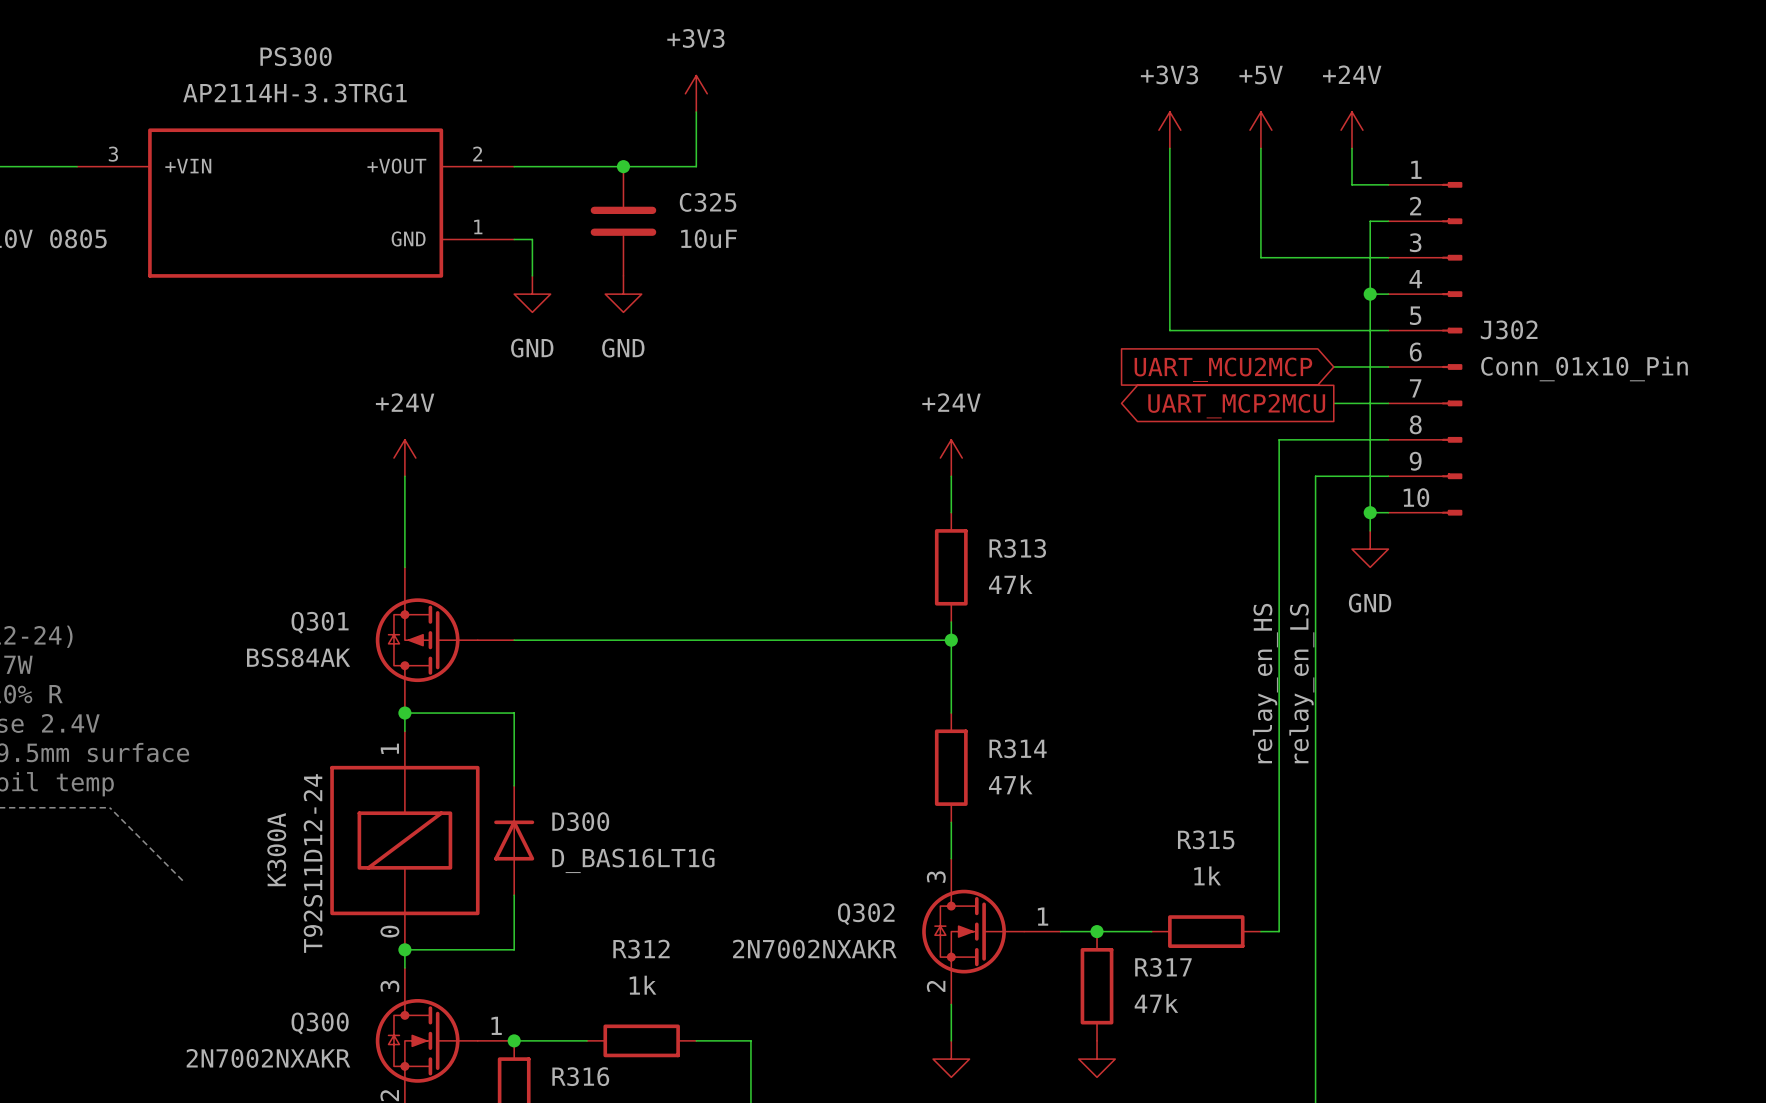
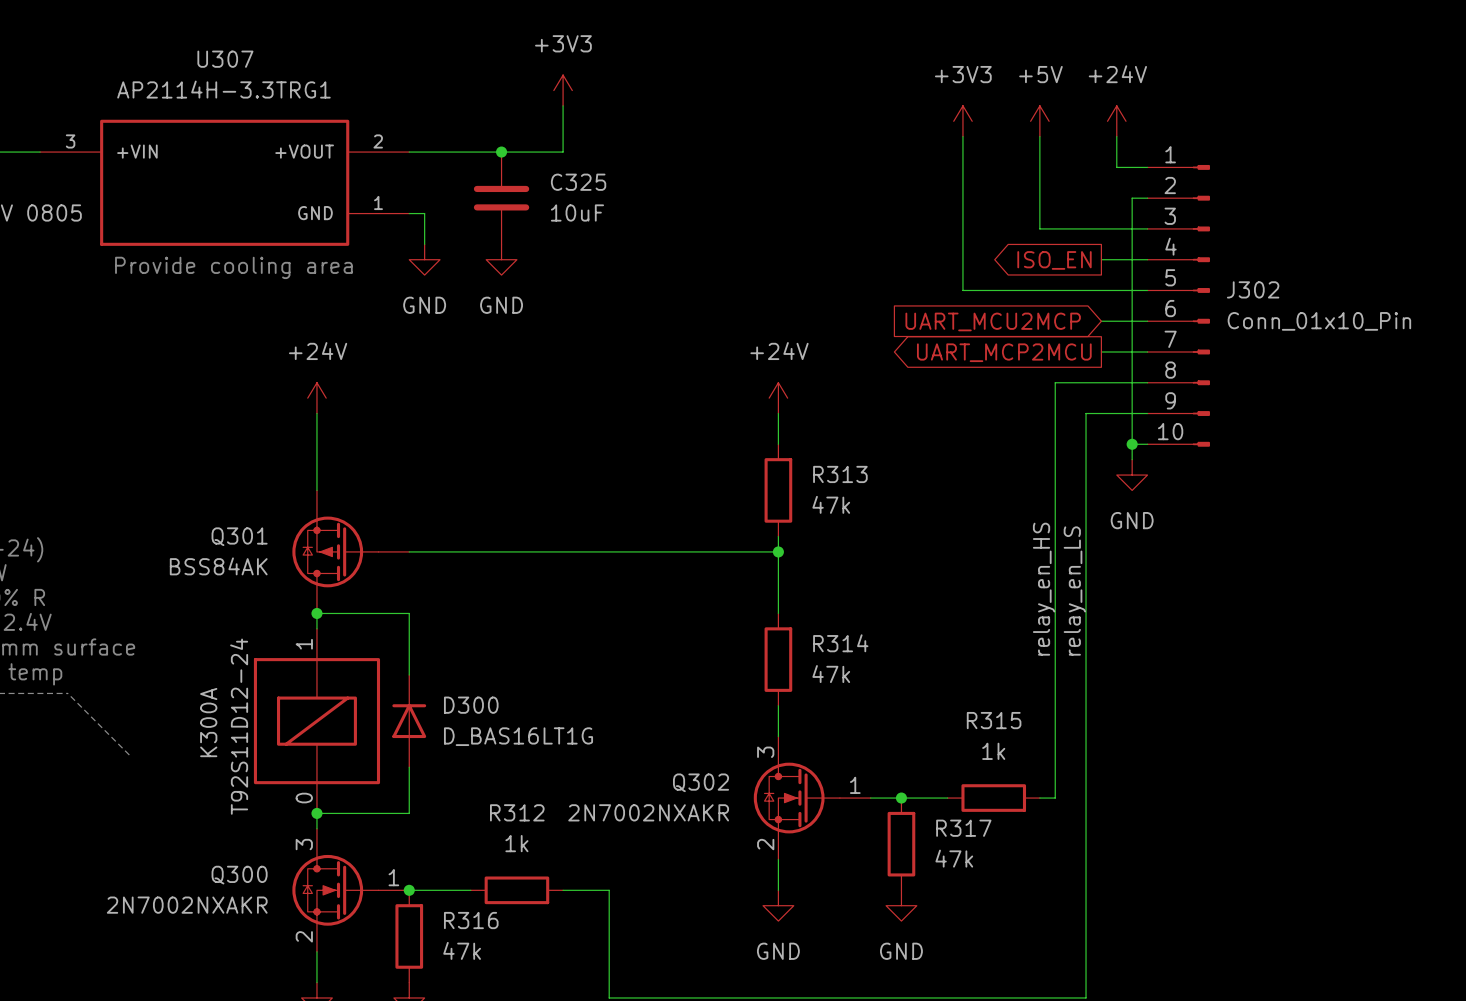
PS300 name: PS300 (296, 56) -> U307 (225, 59)
wire: none -> (1101, 259) (1132, 259)
junction: (1370, 294) -> none
global label: none -> ISO_EN (1054, 260)
text: none -> Provide cooling area (233, 267)

